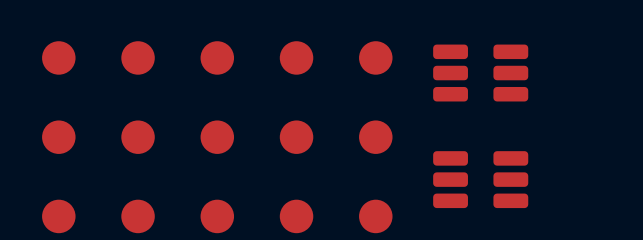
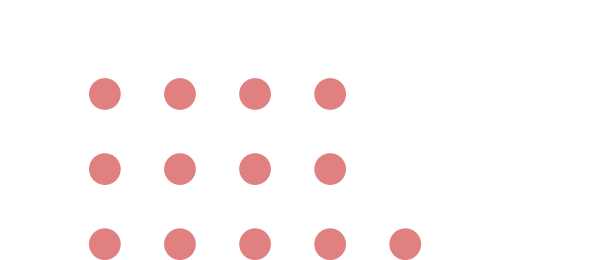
part: (375, 57) -> none
part: (480, 73) -> none
part: (375, 137) -> none
part: (480, 179) -> none

